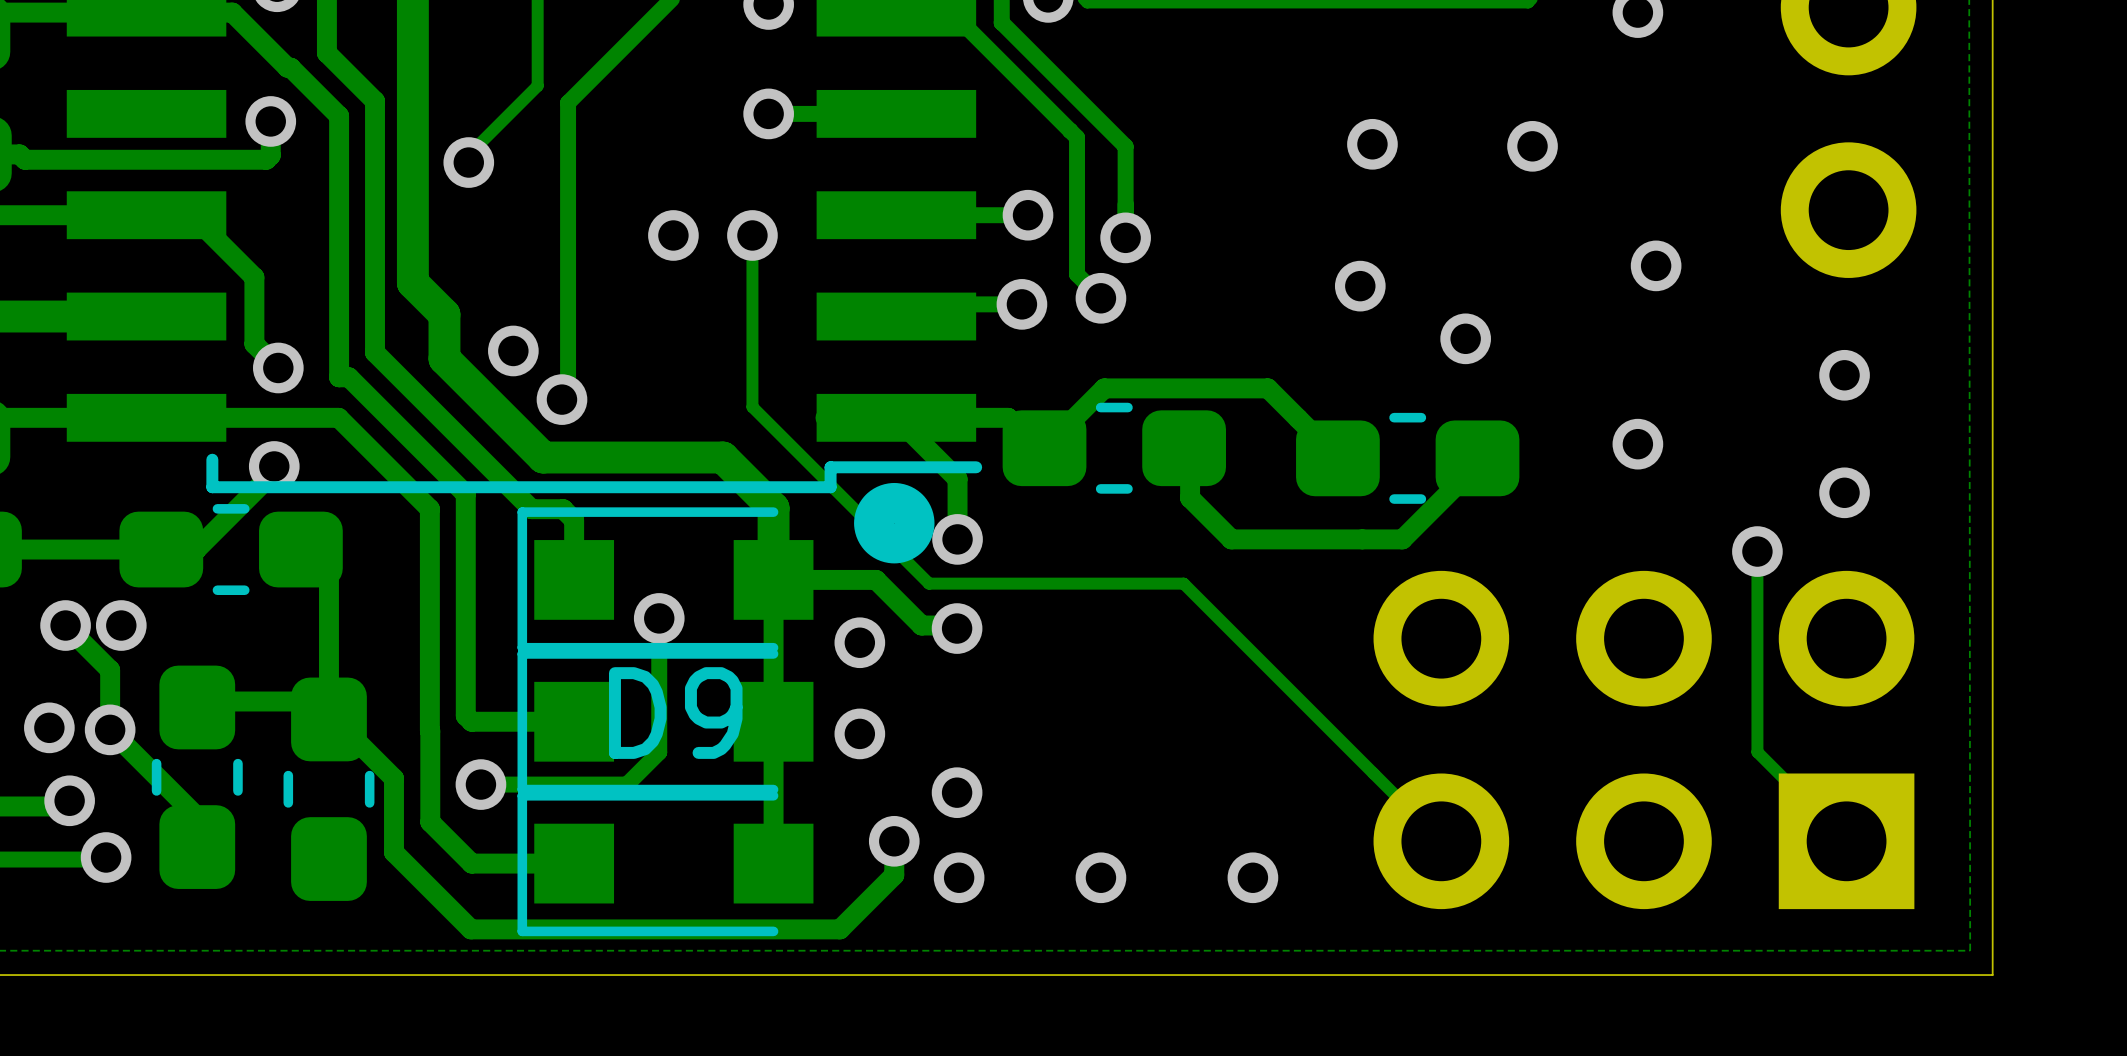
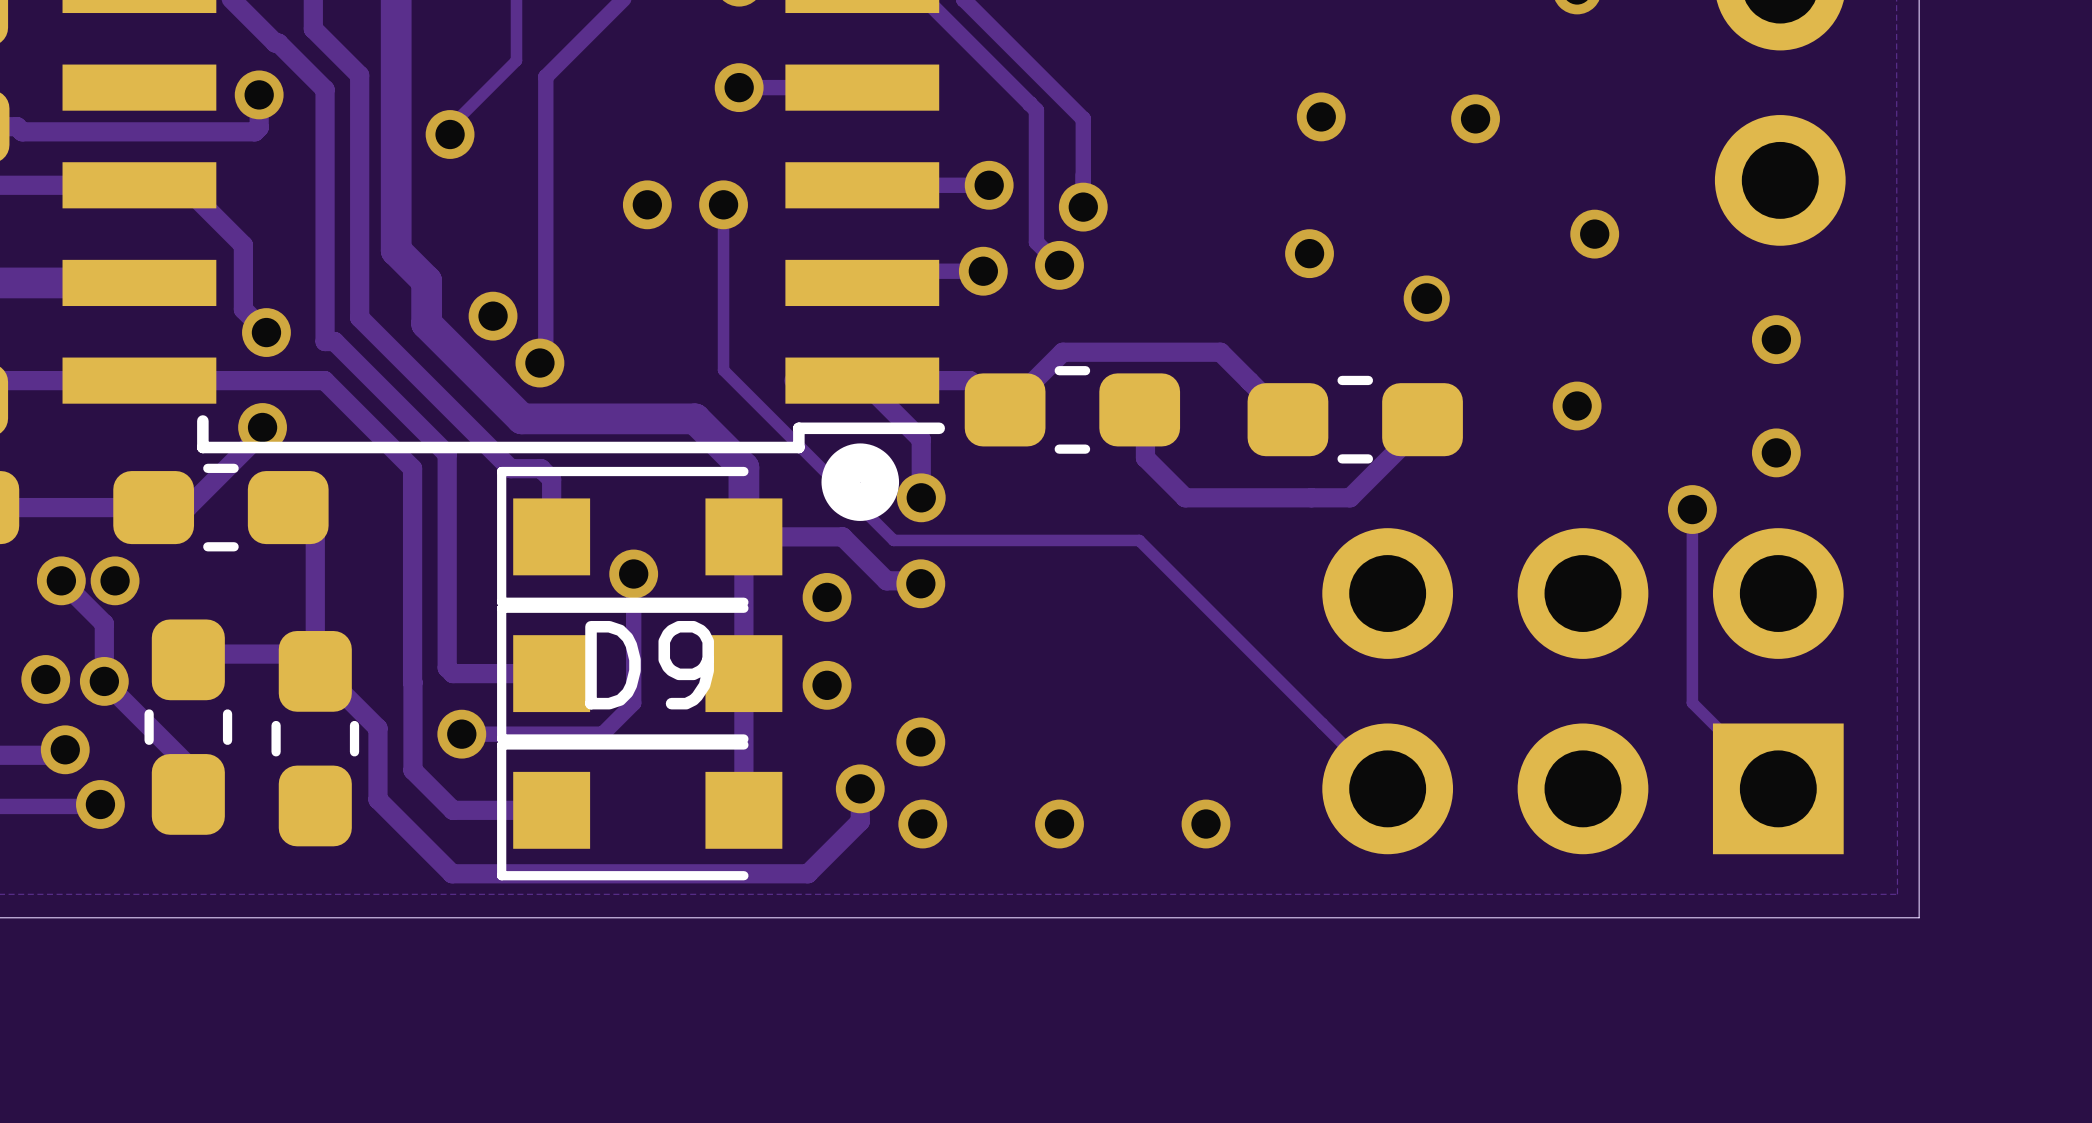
via position: (1465, 338) -> (1426, 298)

